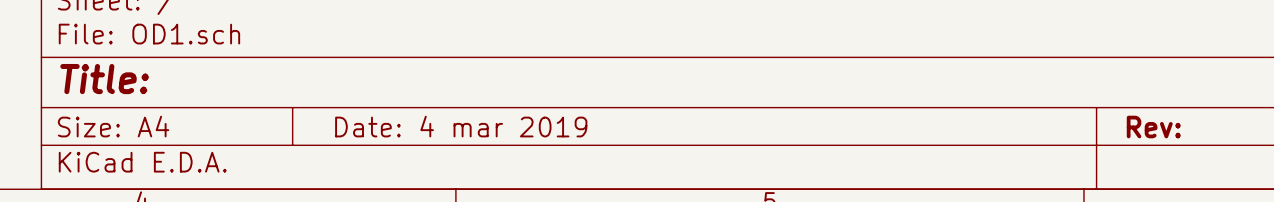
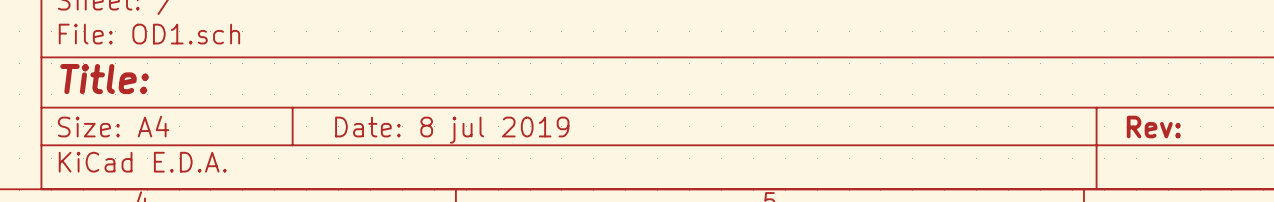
title block: Date: 4 mar 2019 (461, 126) -> Date: 8 jul 2019 (452, 130)

